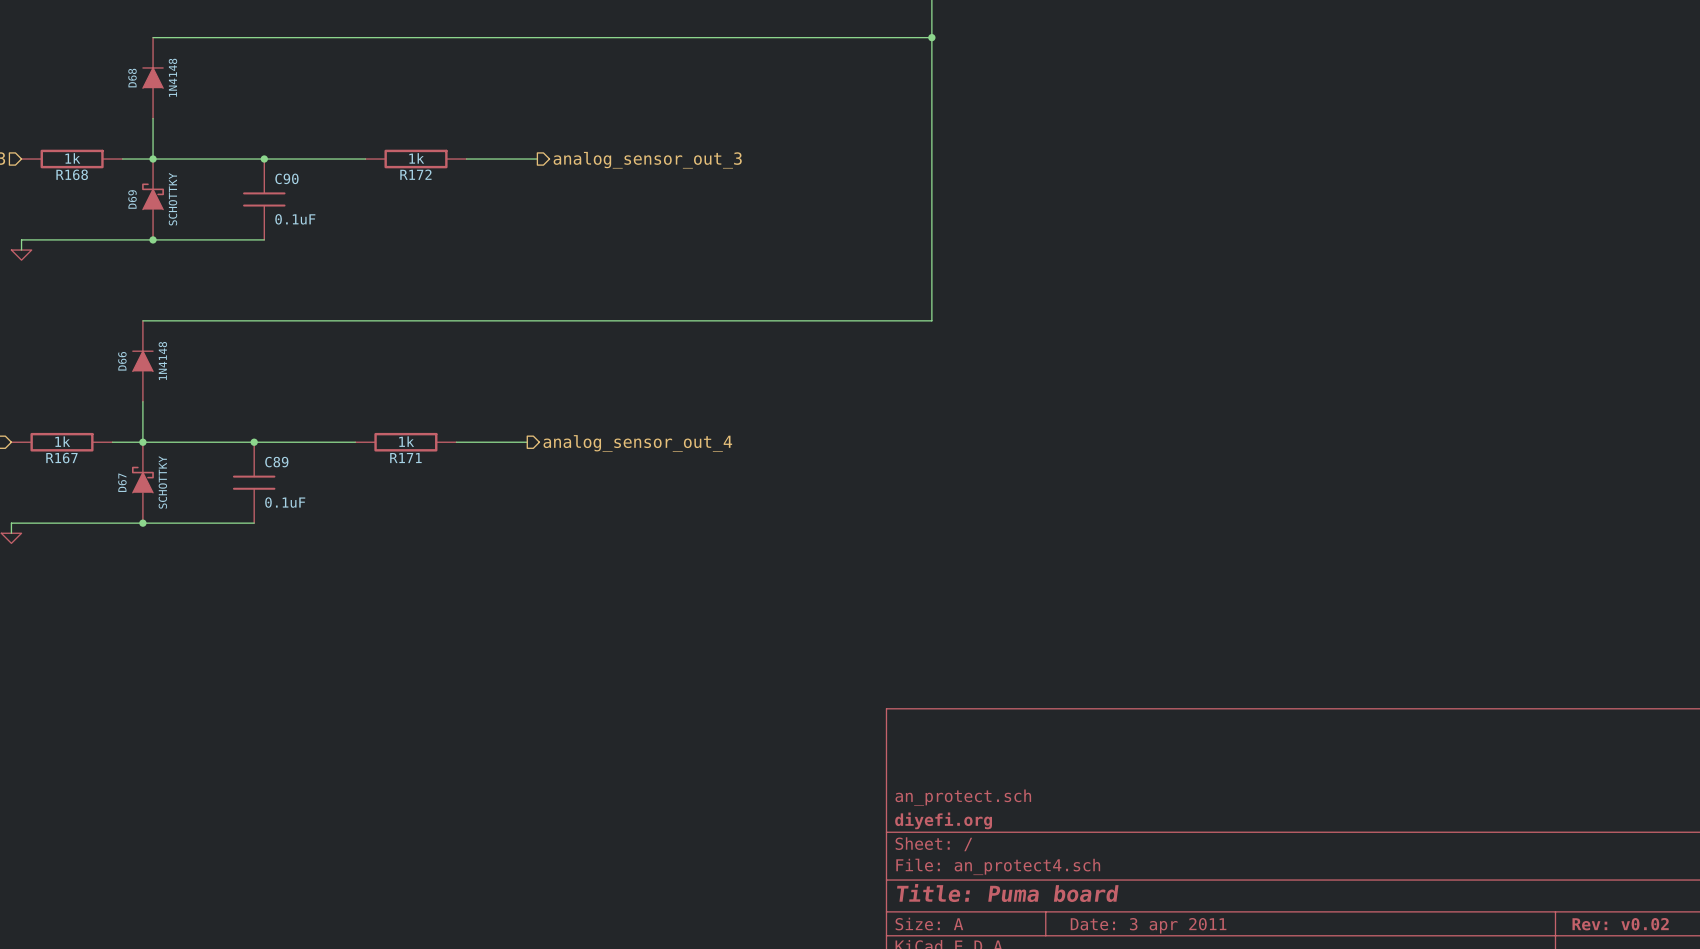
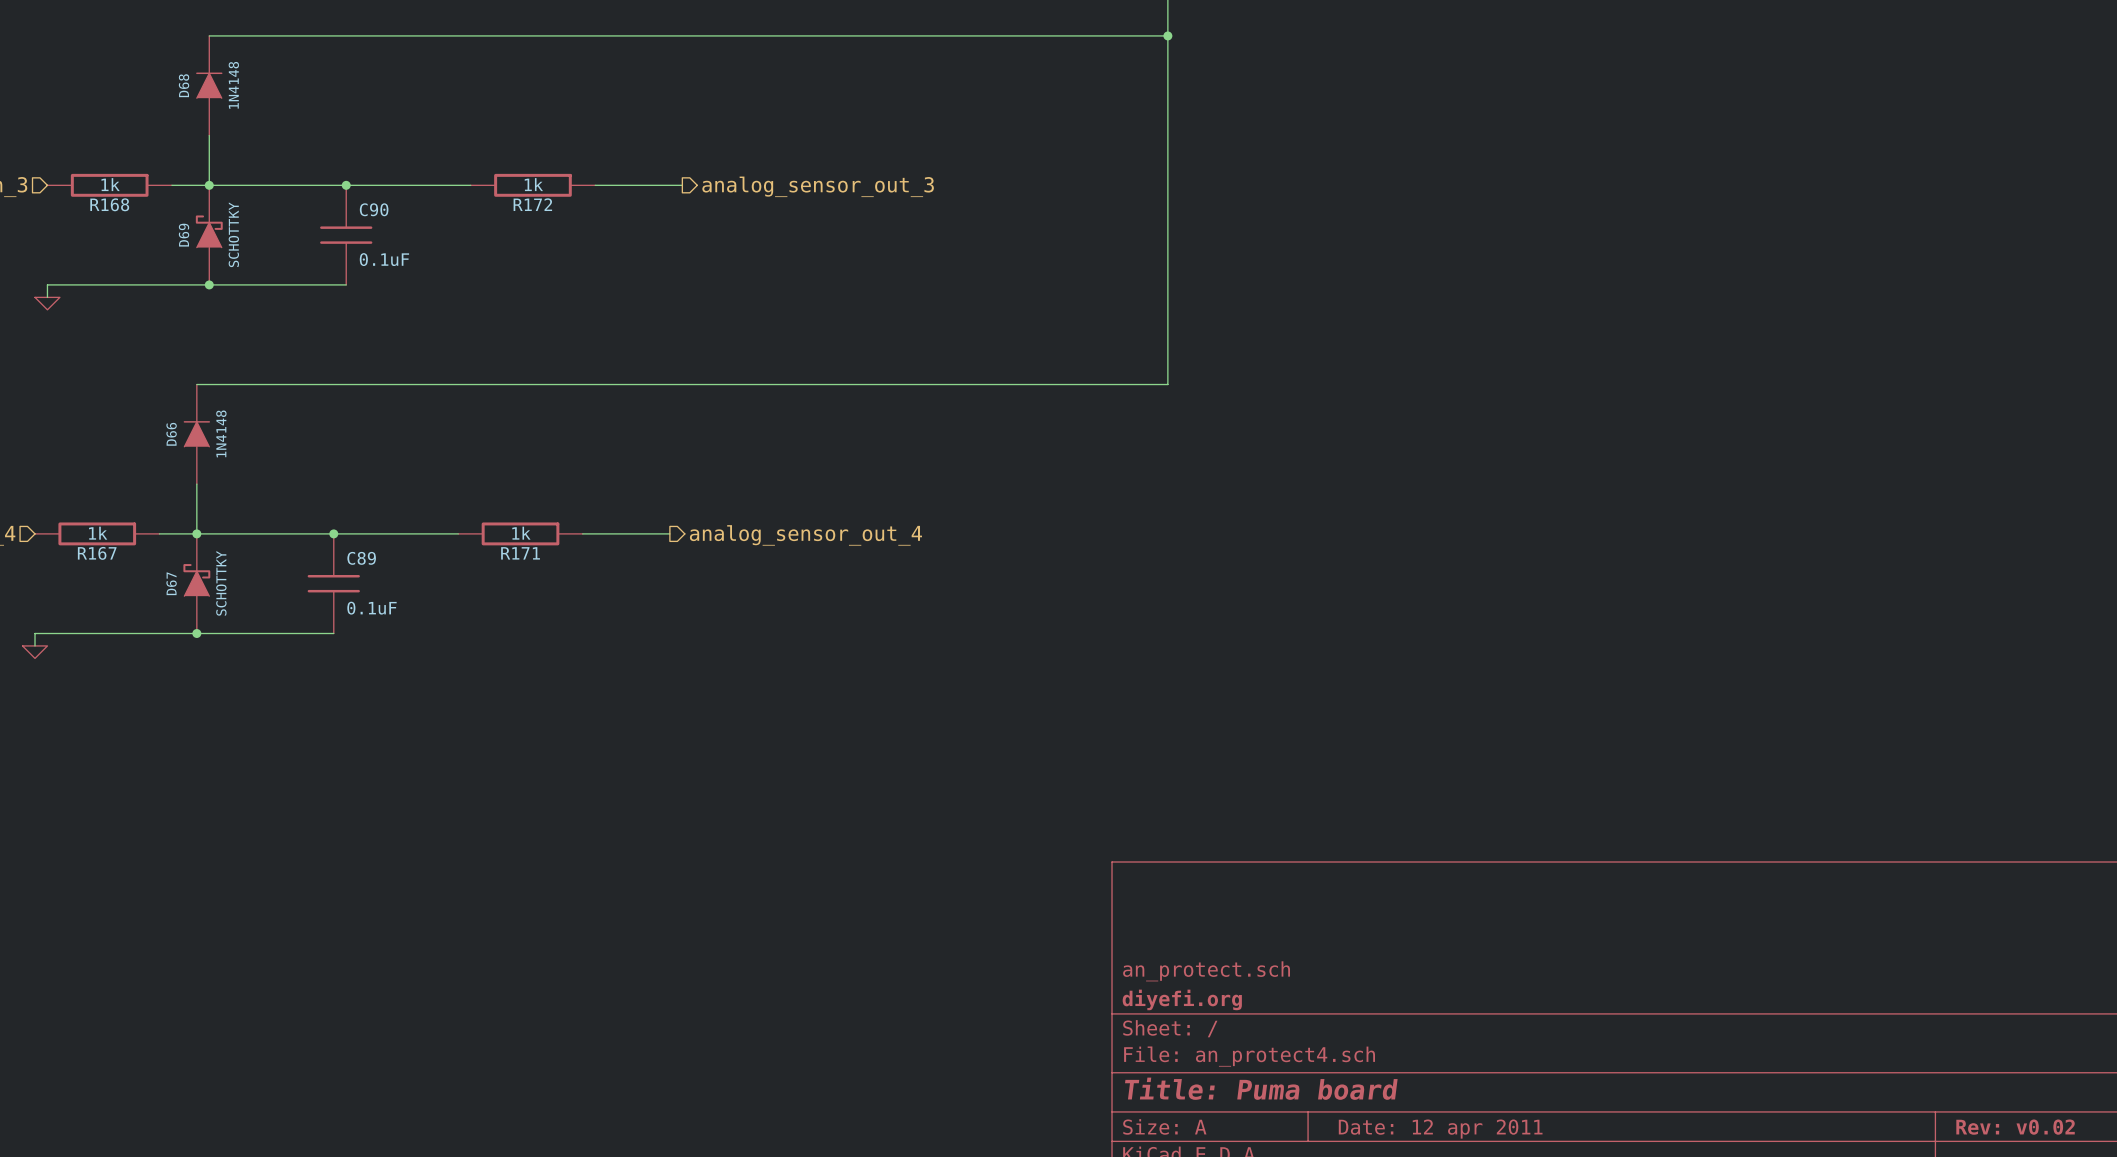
title block: Date: 3 apr 2011 (1148, 925) -> Date: 12 apr 2011 (1440, 1129)

